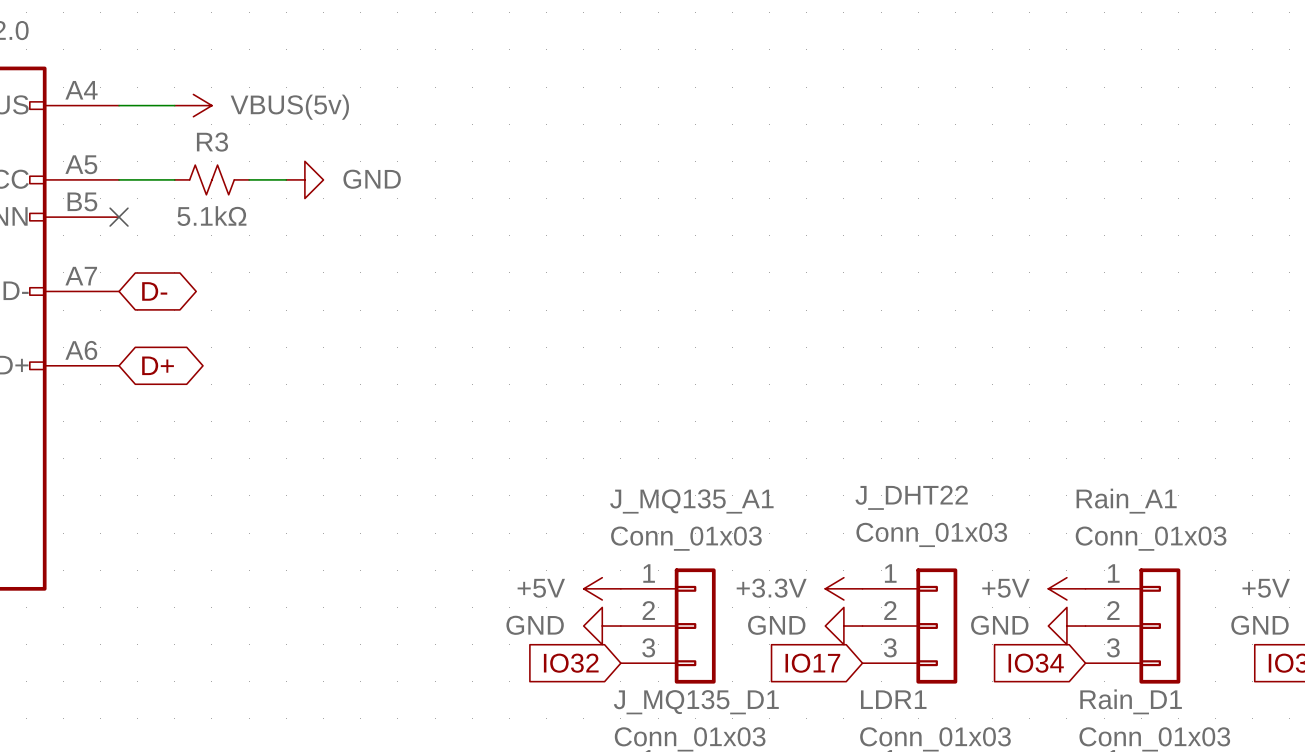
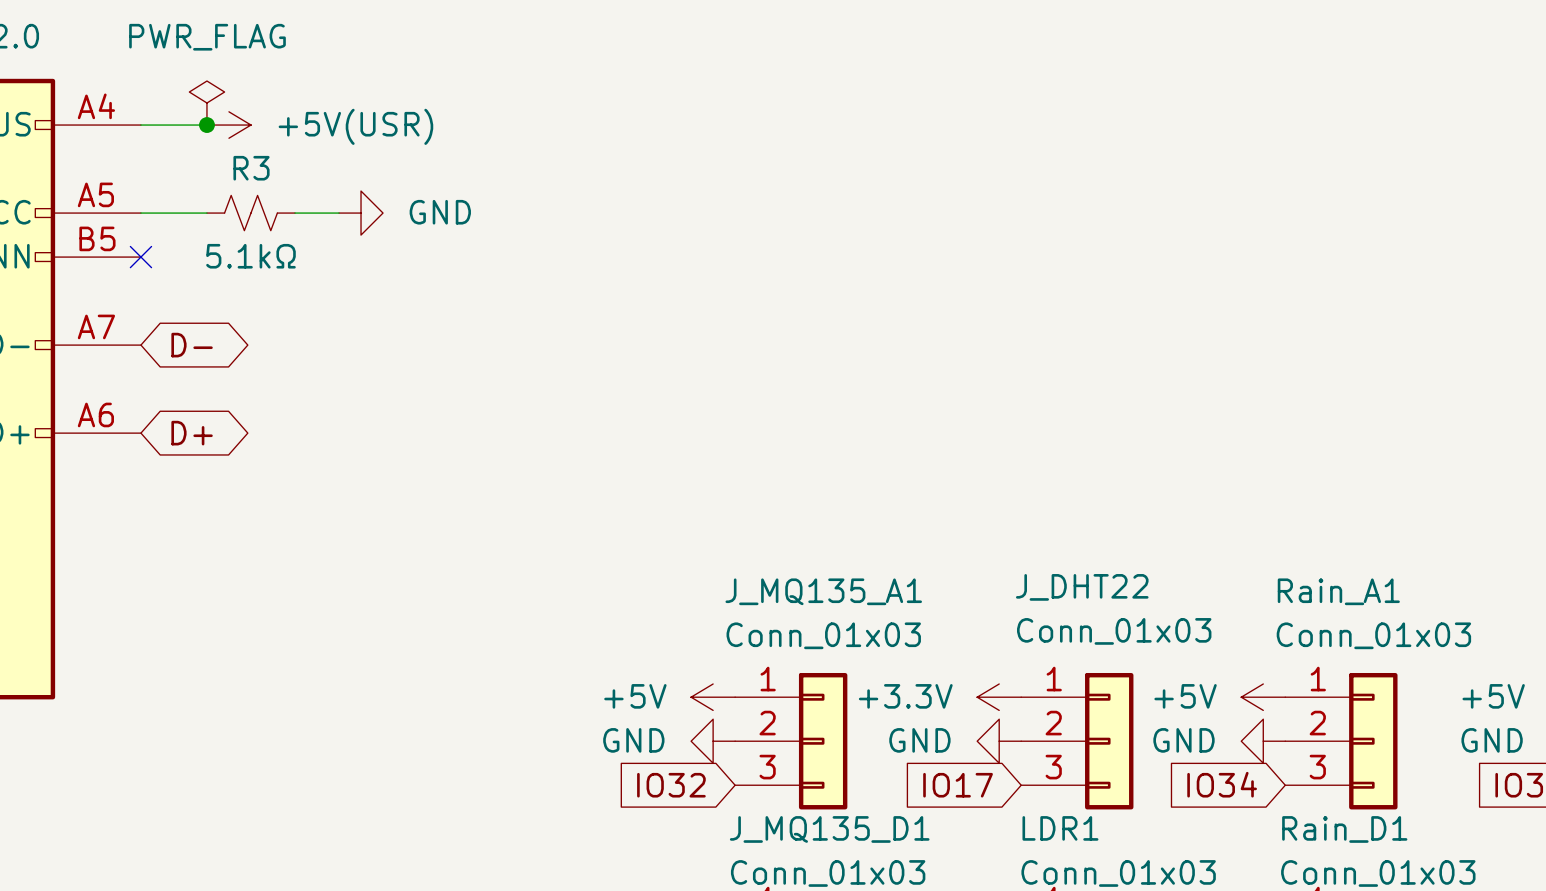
power symbol: none -> PWR_FLAG (206, 103)
junction: none -> (206, 125)
power symbol: VBUS(5v) (193, 105) -> +5V(USR) (228, 125)

